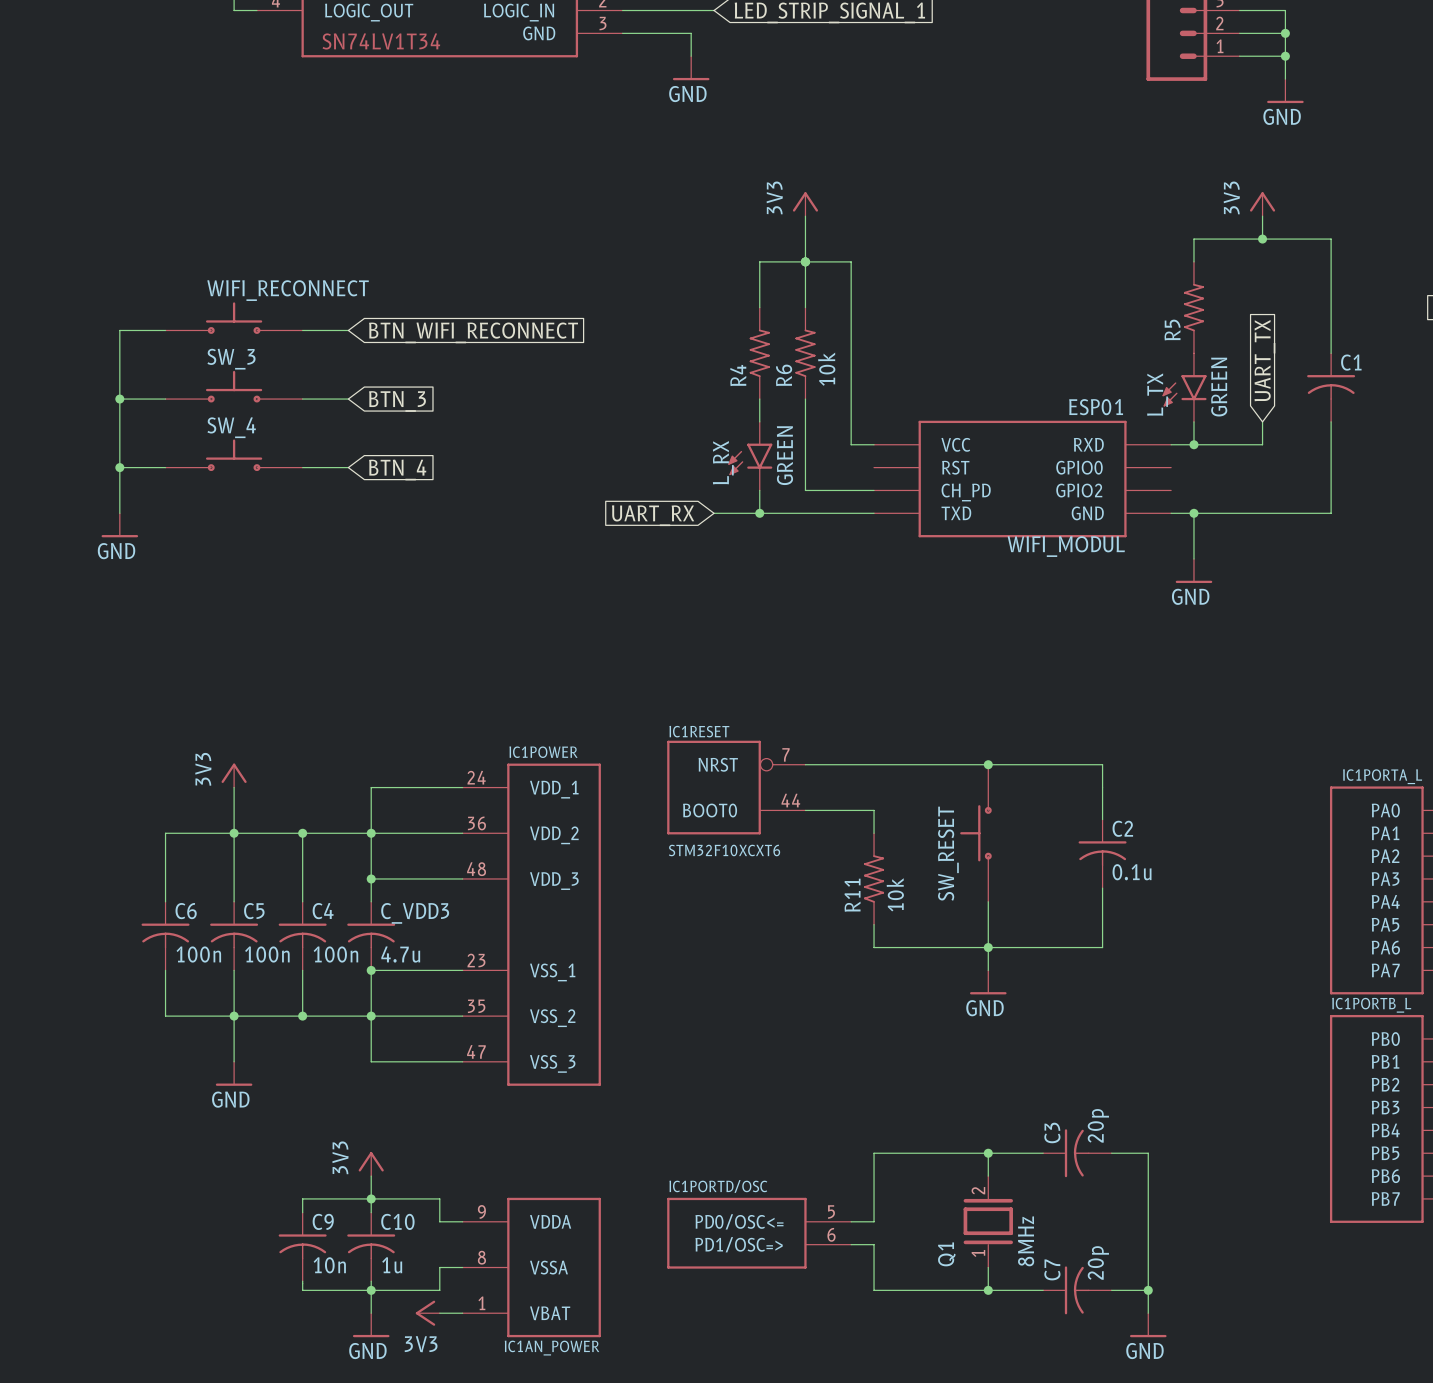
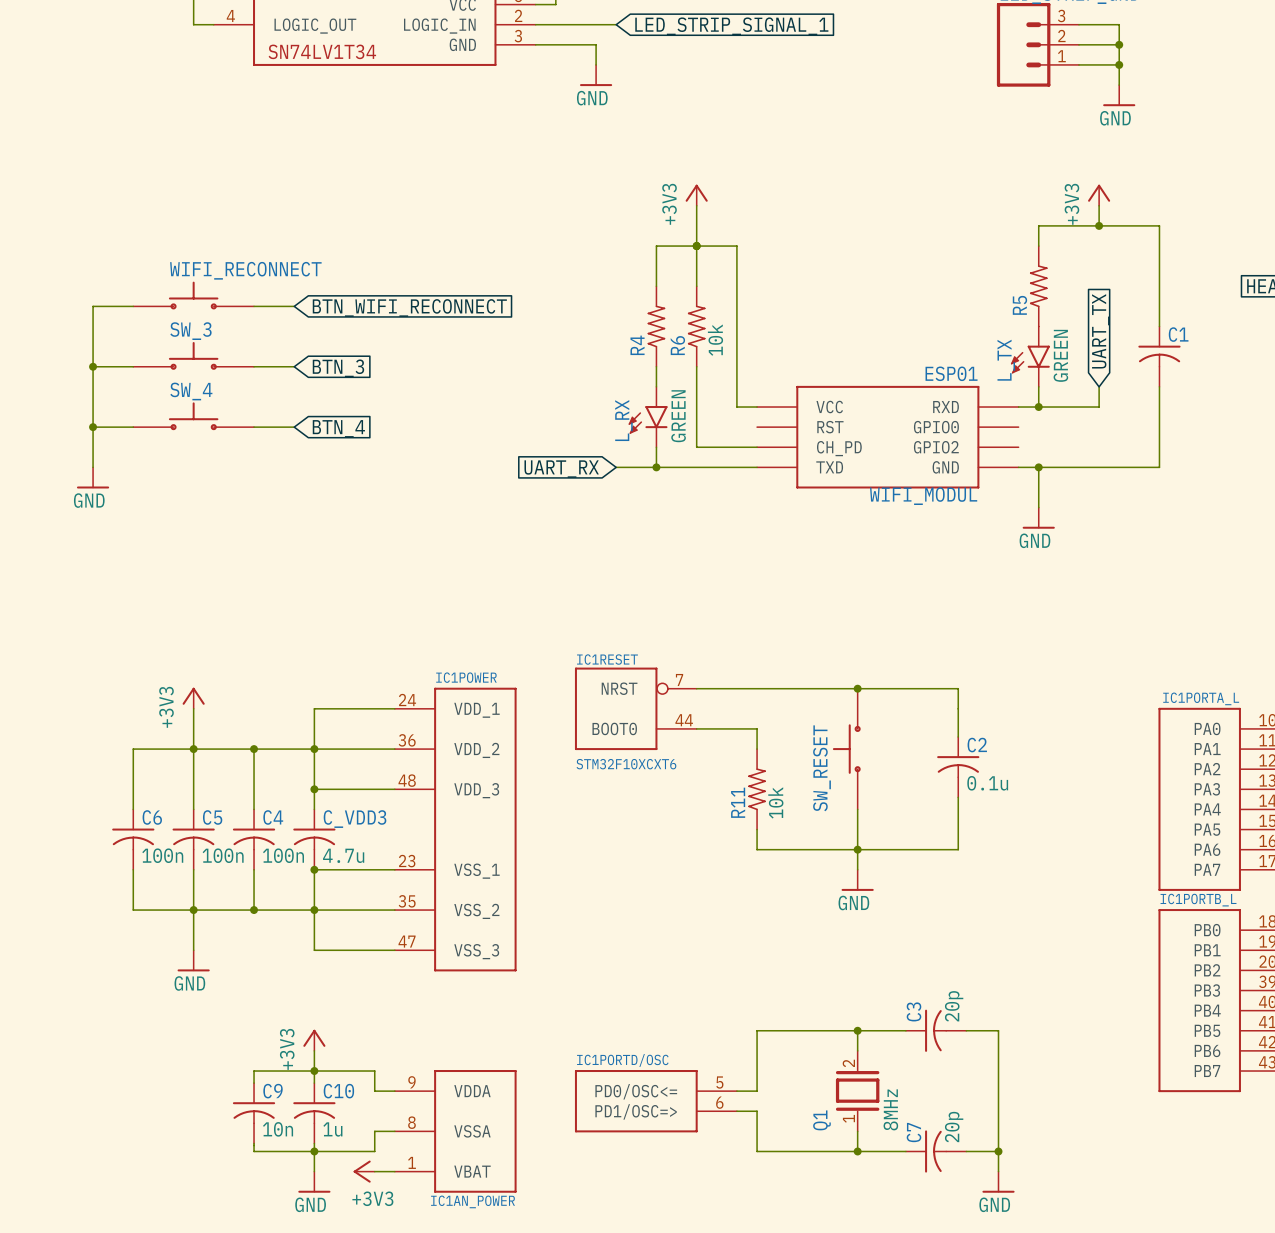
power symbol: 3V3 (805, 204) -> +3V3 (696, 195)
power symbol: 3V3 (1262, 204) -> +3V3 (1099, 195)
power symbol: 3V3 (234, 775) -> +3V3 (193, 698)
power symbol: 3V3 (371, 1164) -> +3V3 (314, 1040)
power symbol: 3V3 (427, 1313) -> +3V3 (364, 1171)

